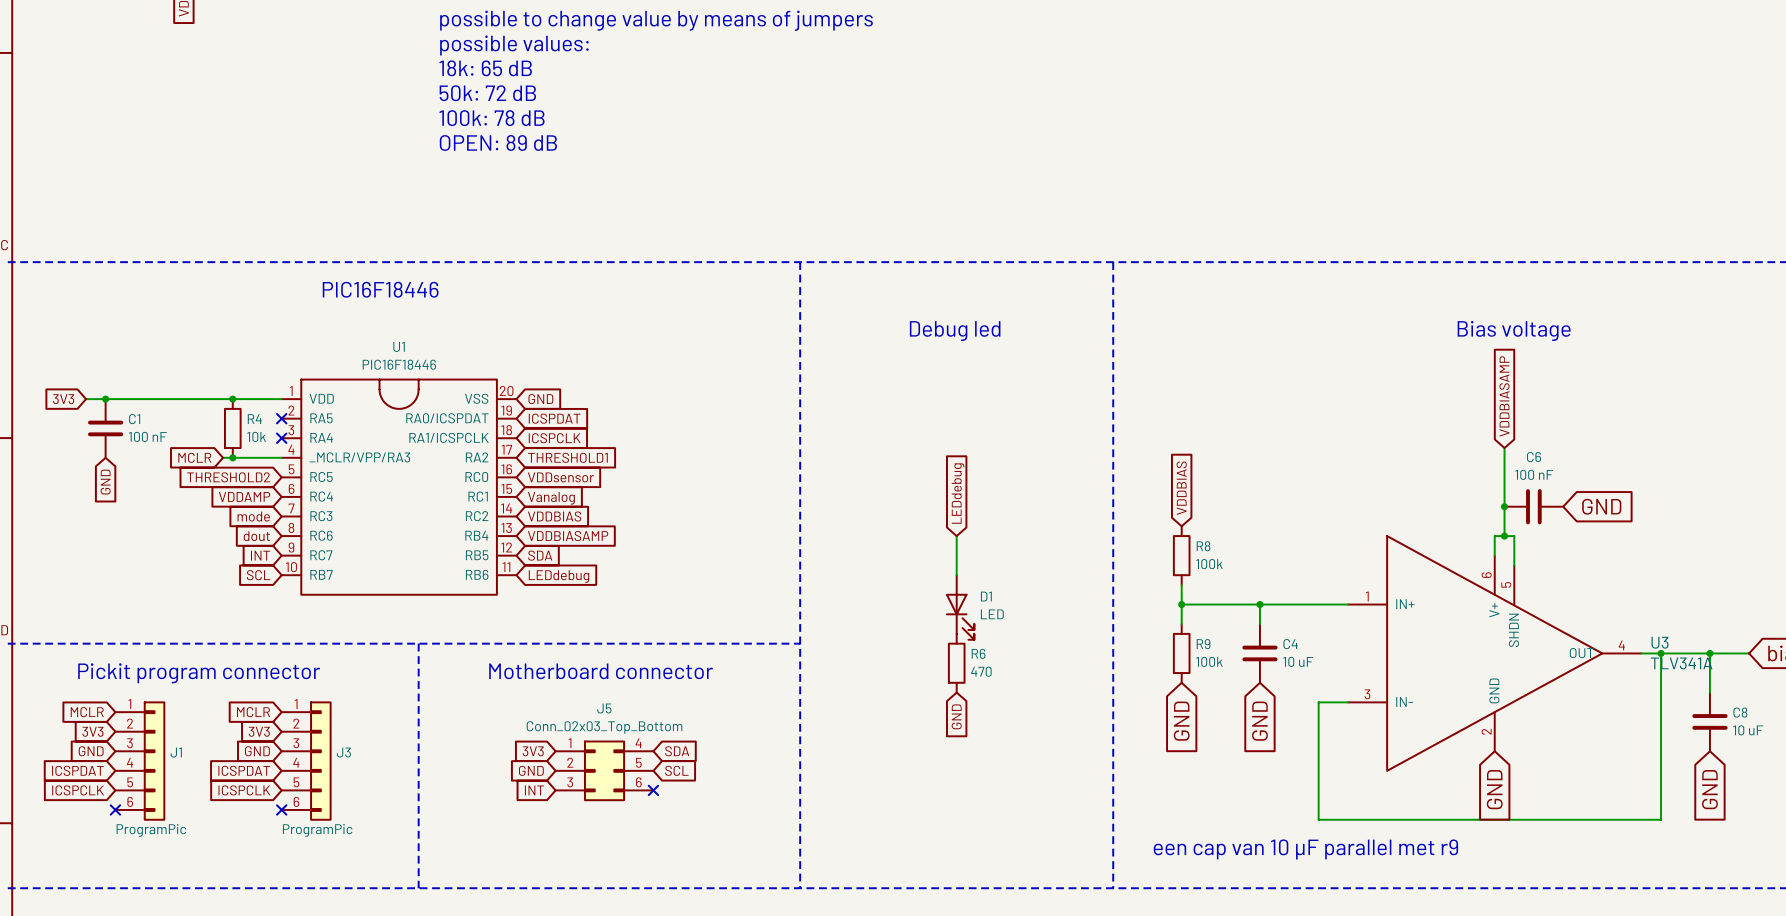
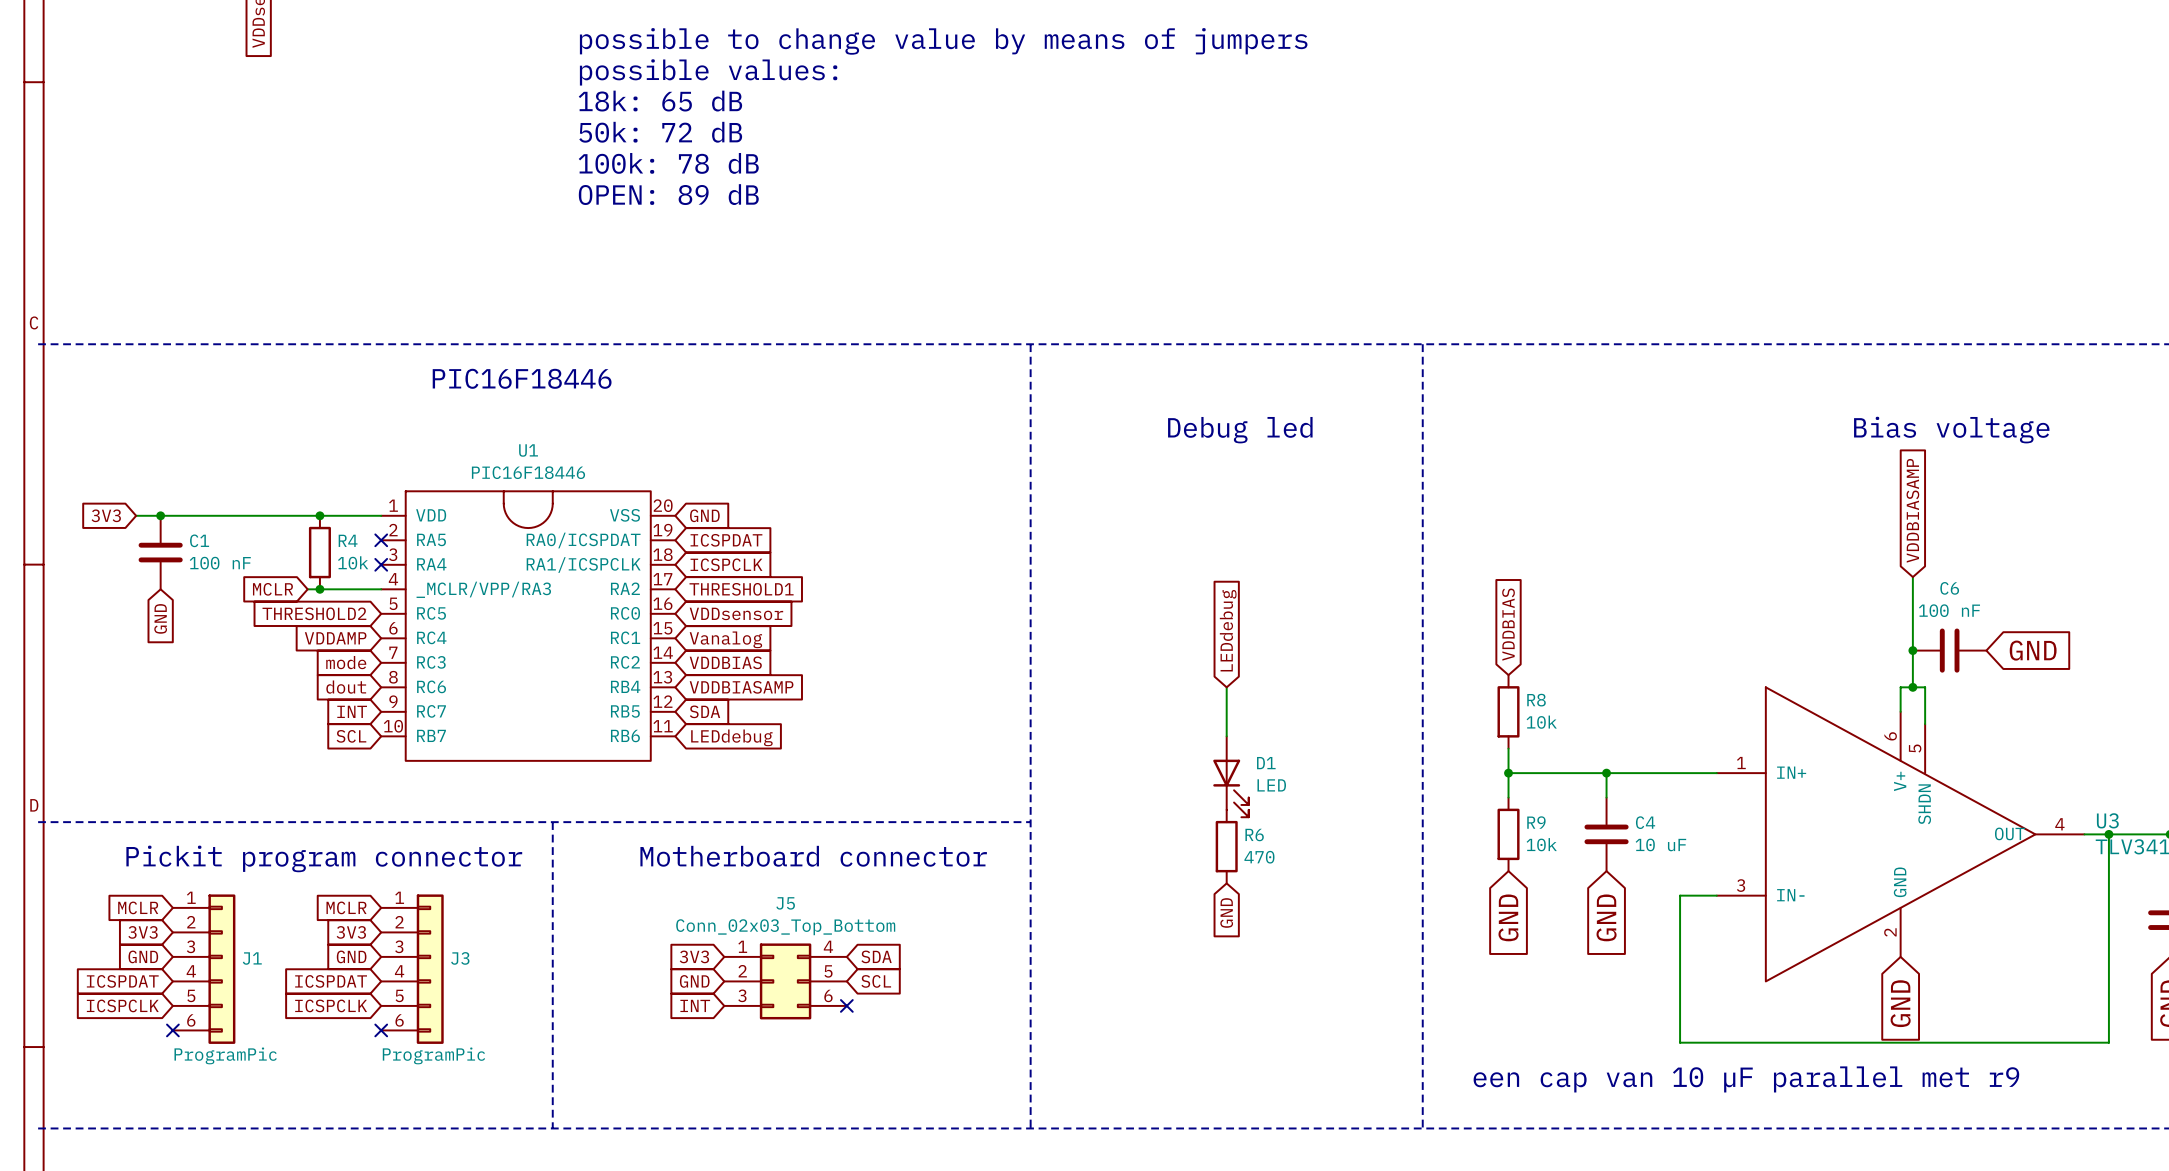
R8 value: 100k (1209, 564) -> 10k (1541, 722)
R9 value: 100k (1209, 661) -> 10k (1541, 844)

